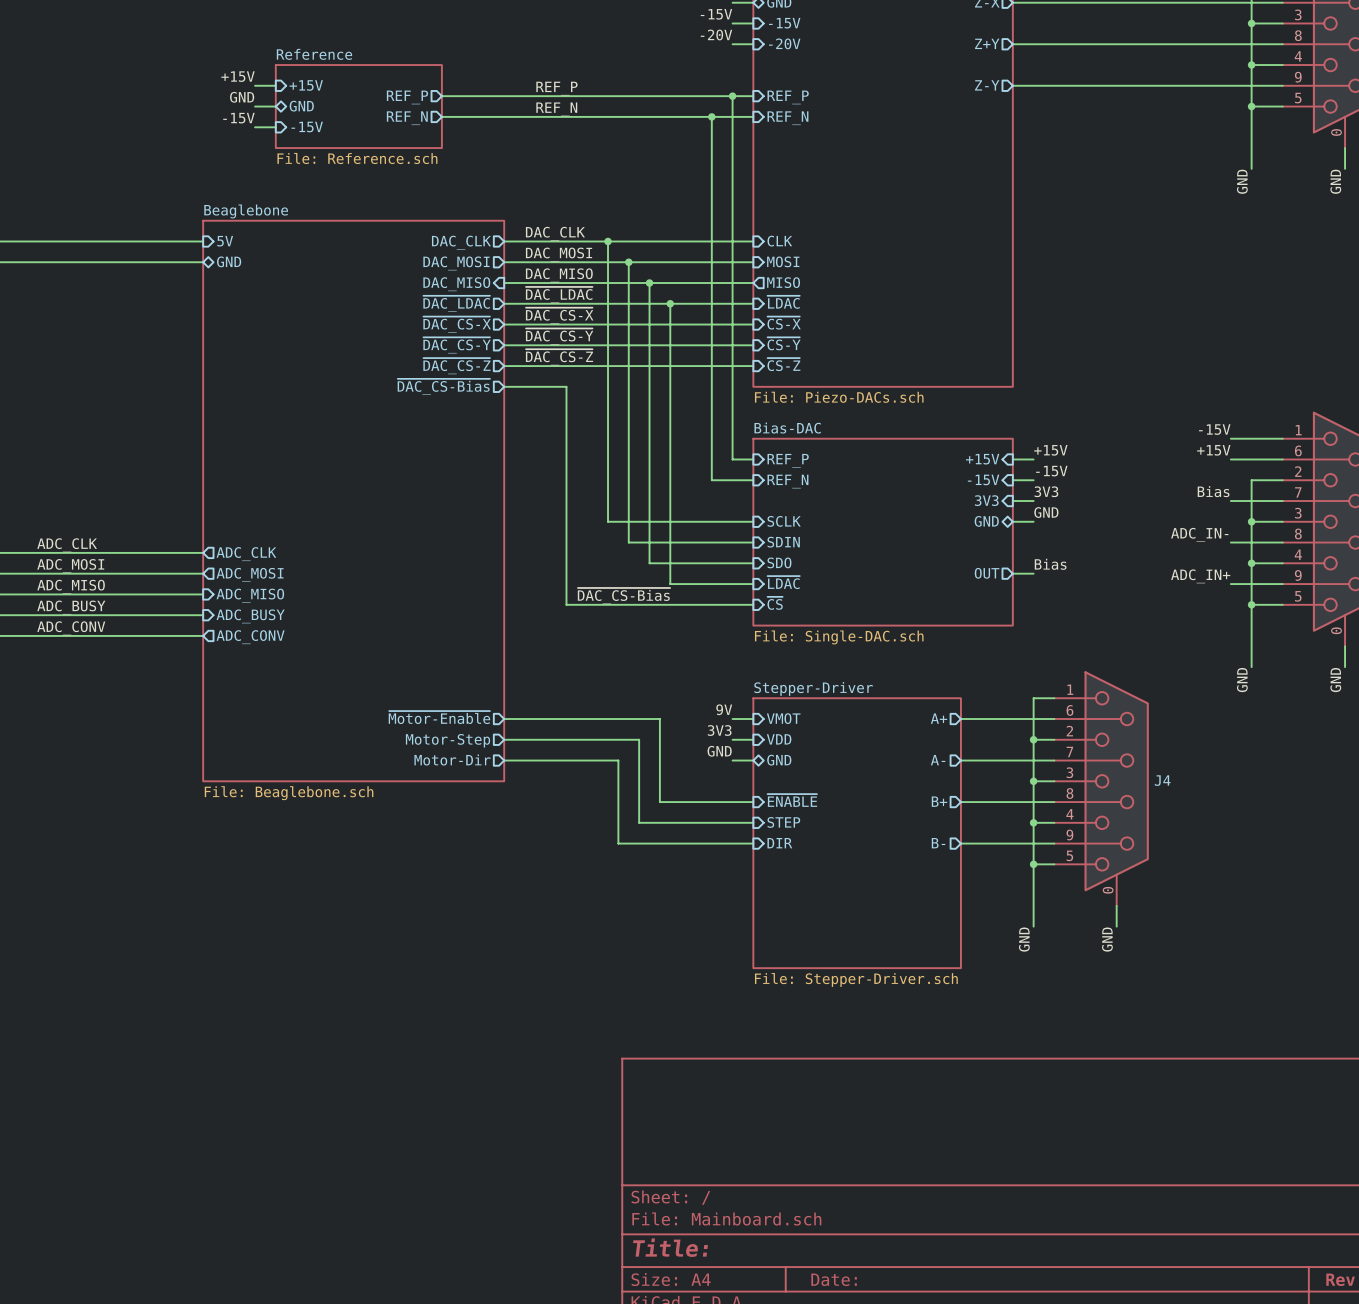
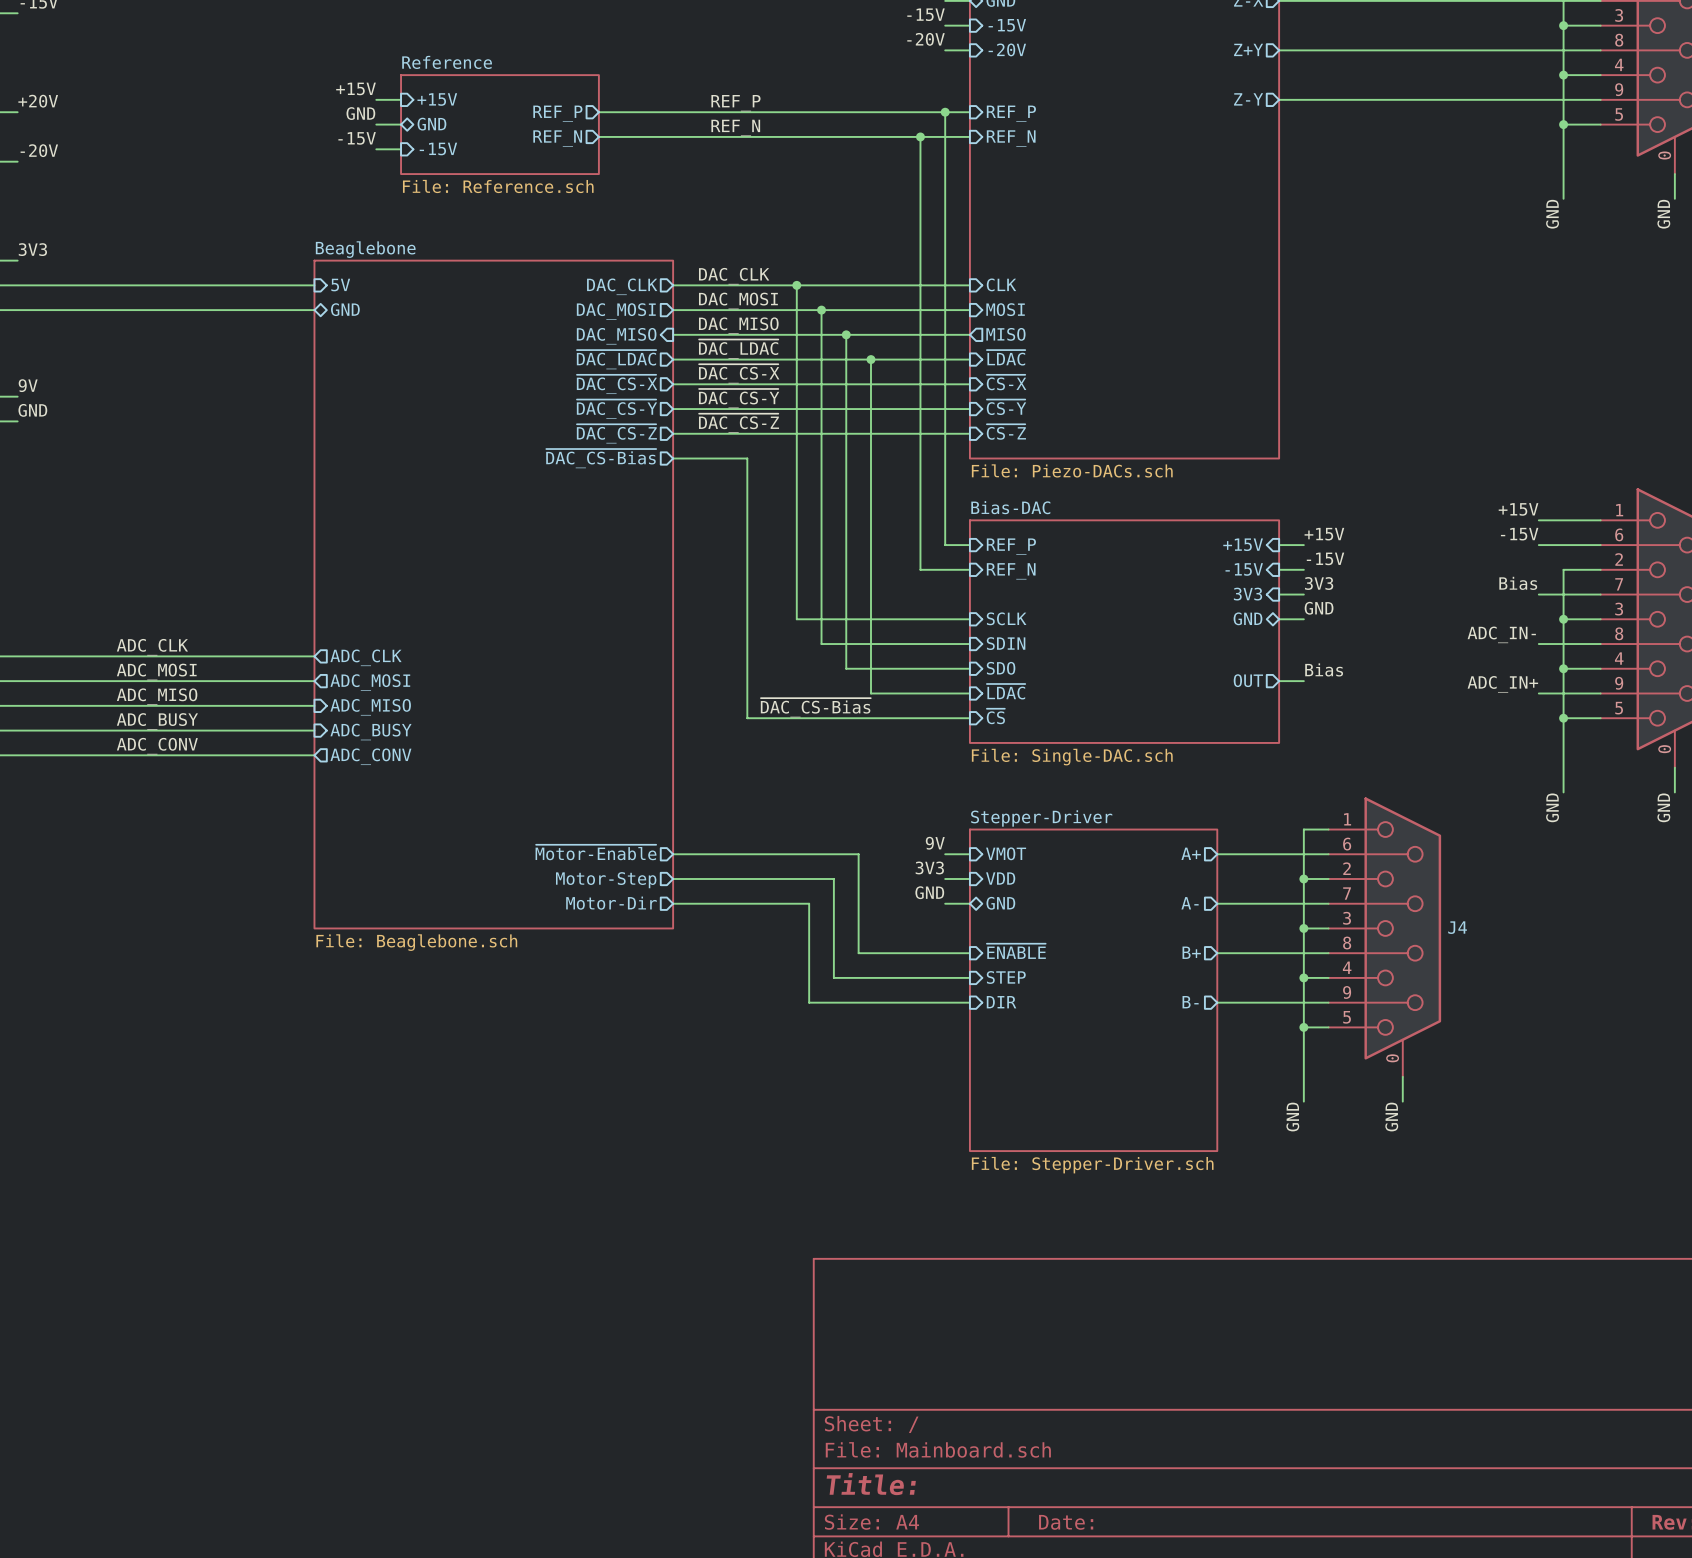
label: -15V (1214, 429) -> +15V (1518, 509)
label: +15V (1213, 450) -> -15V (1519, 534)

